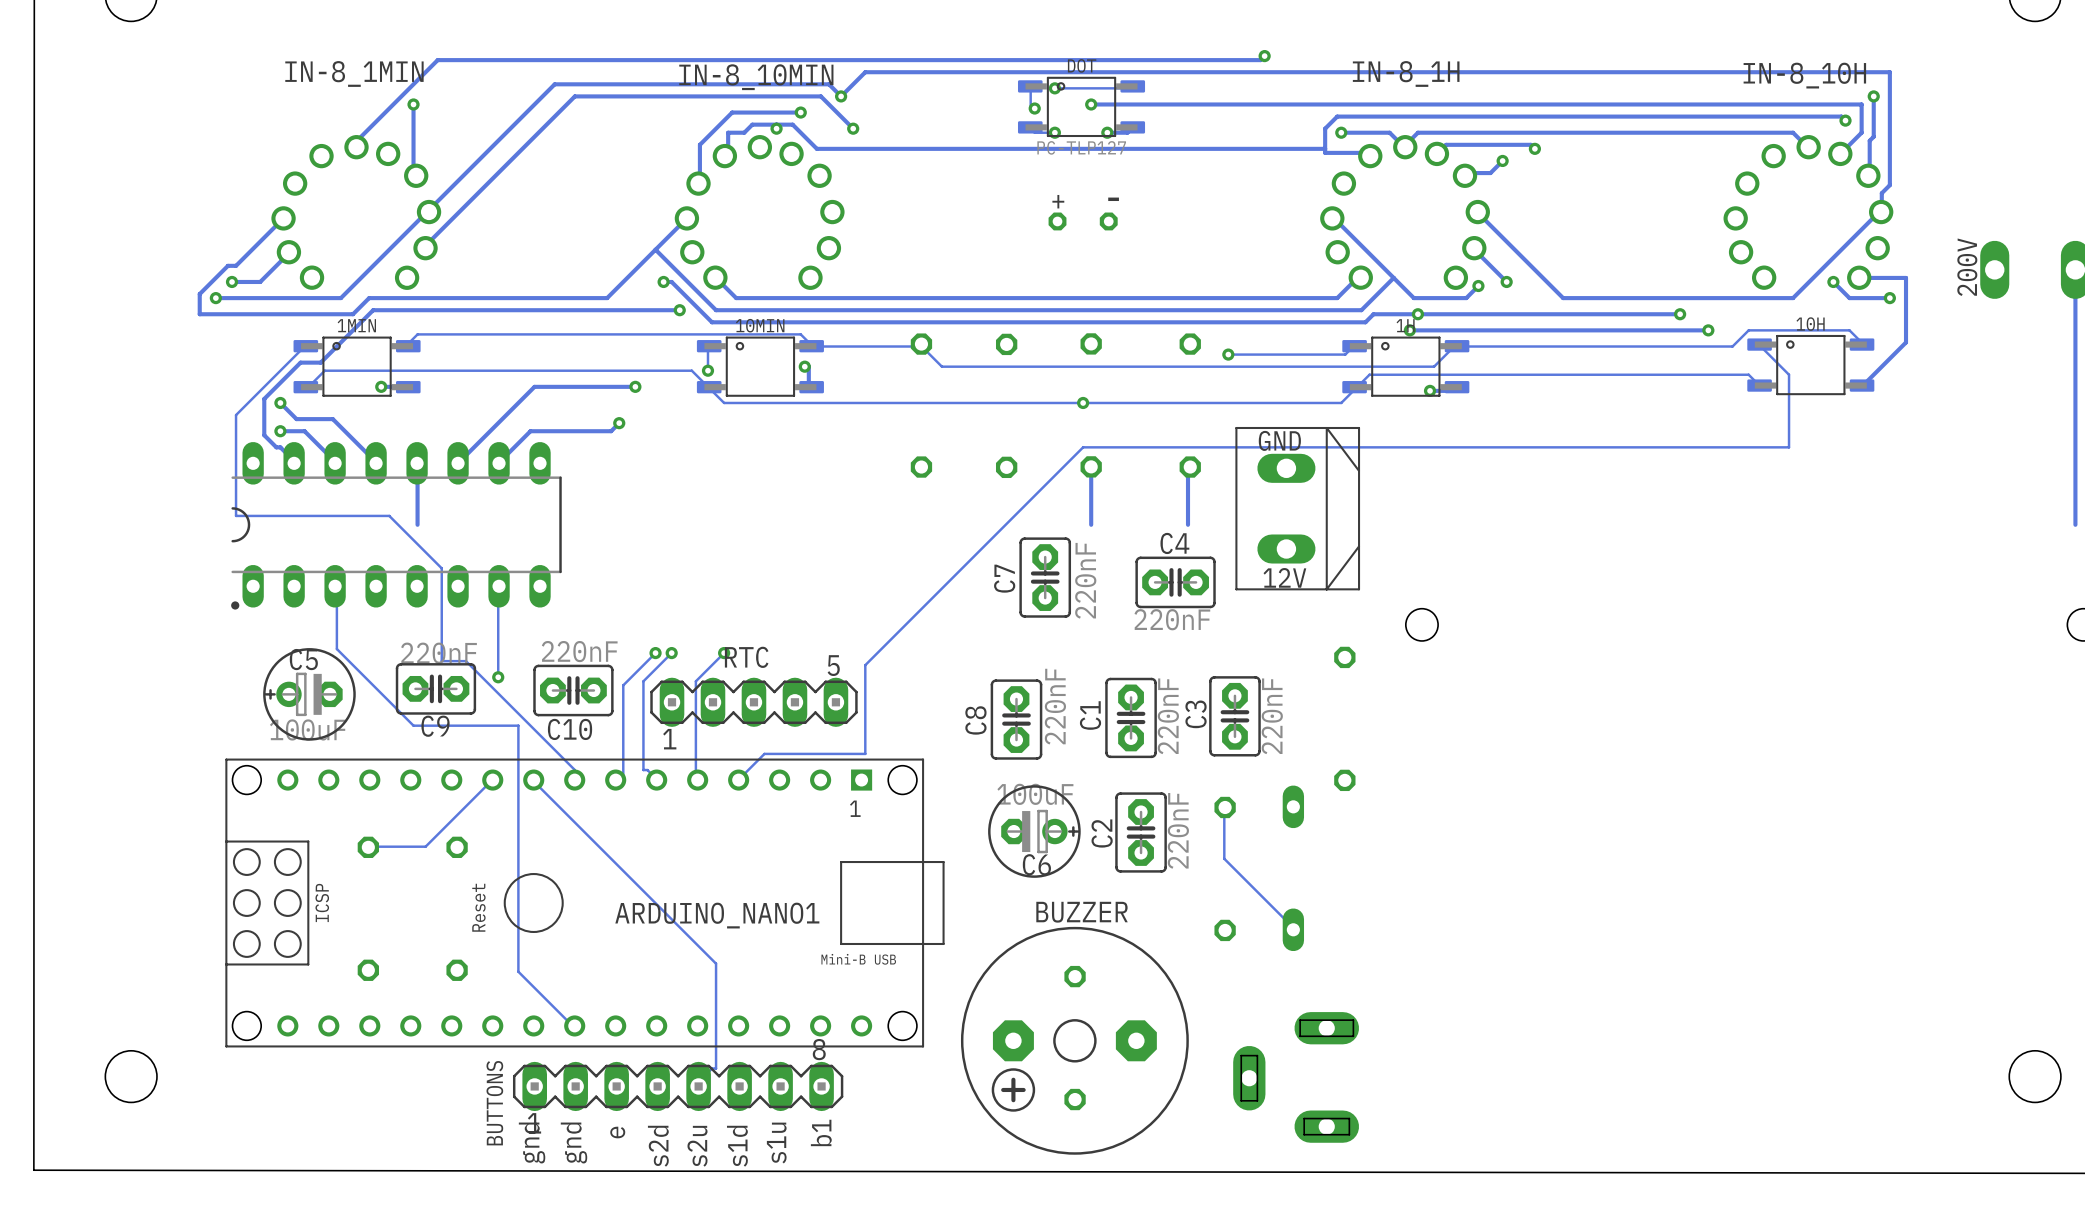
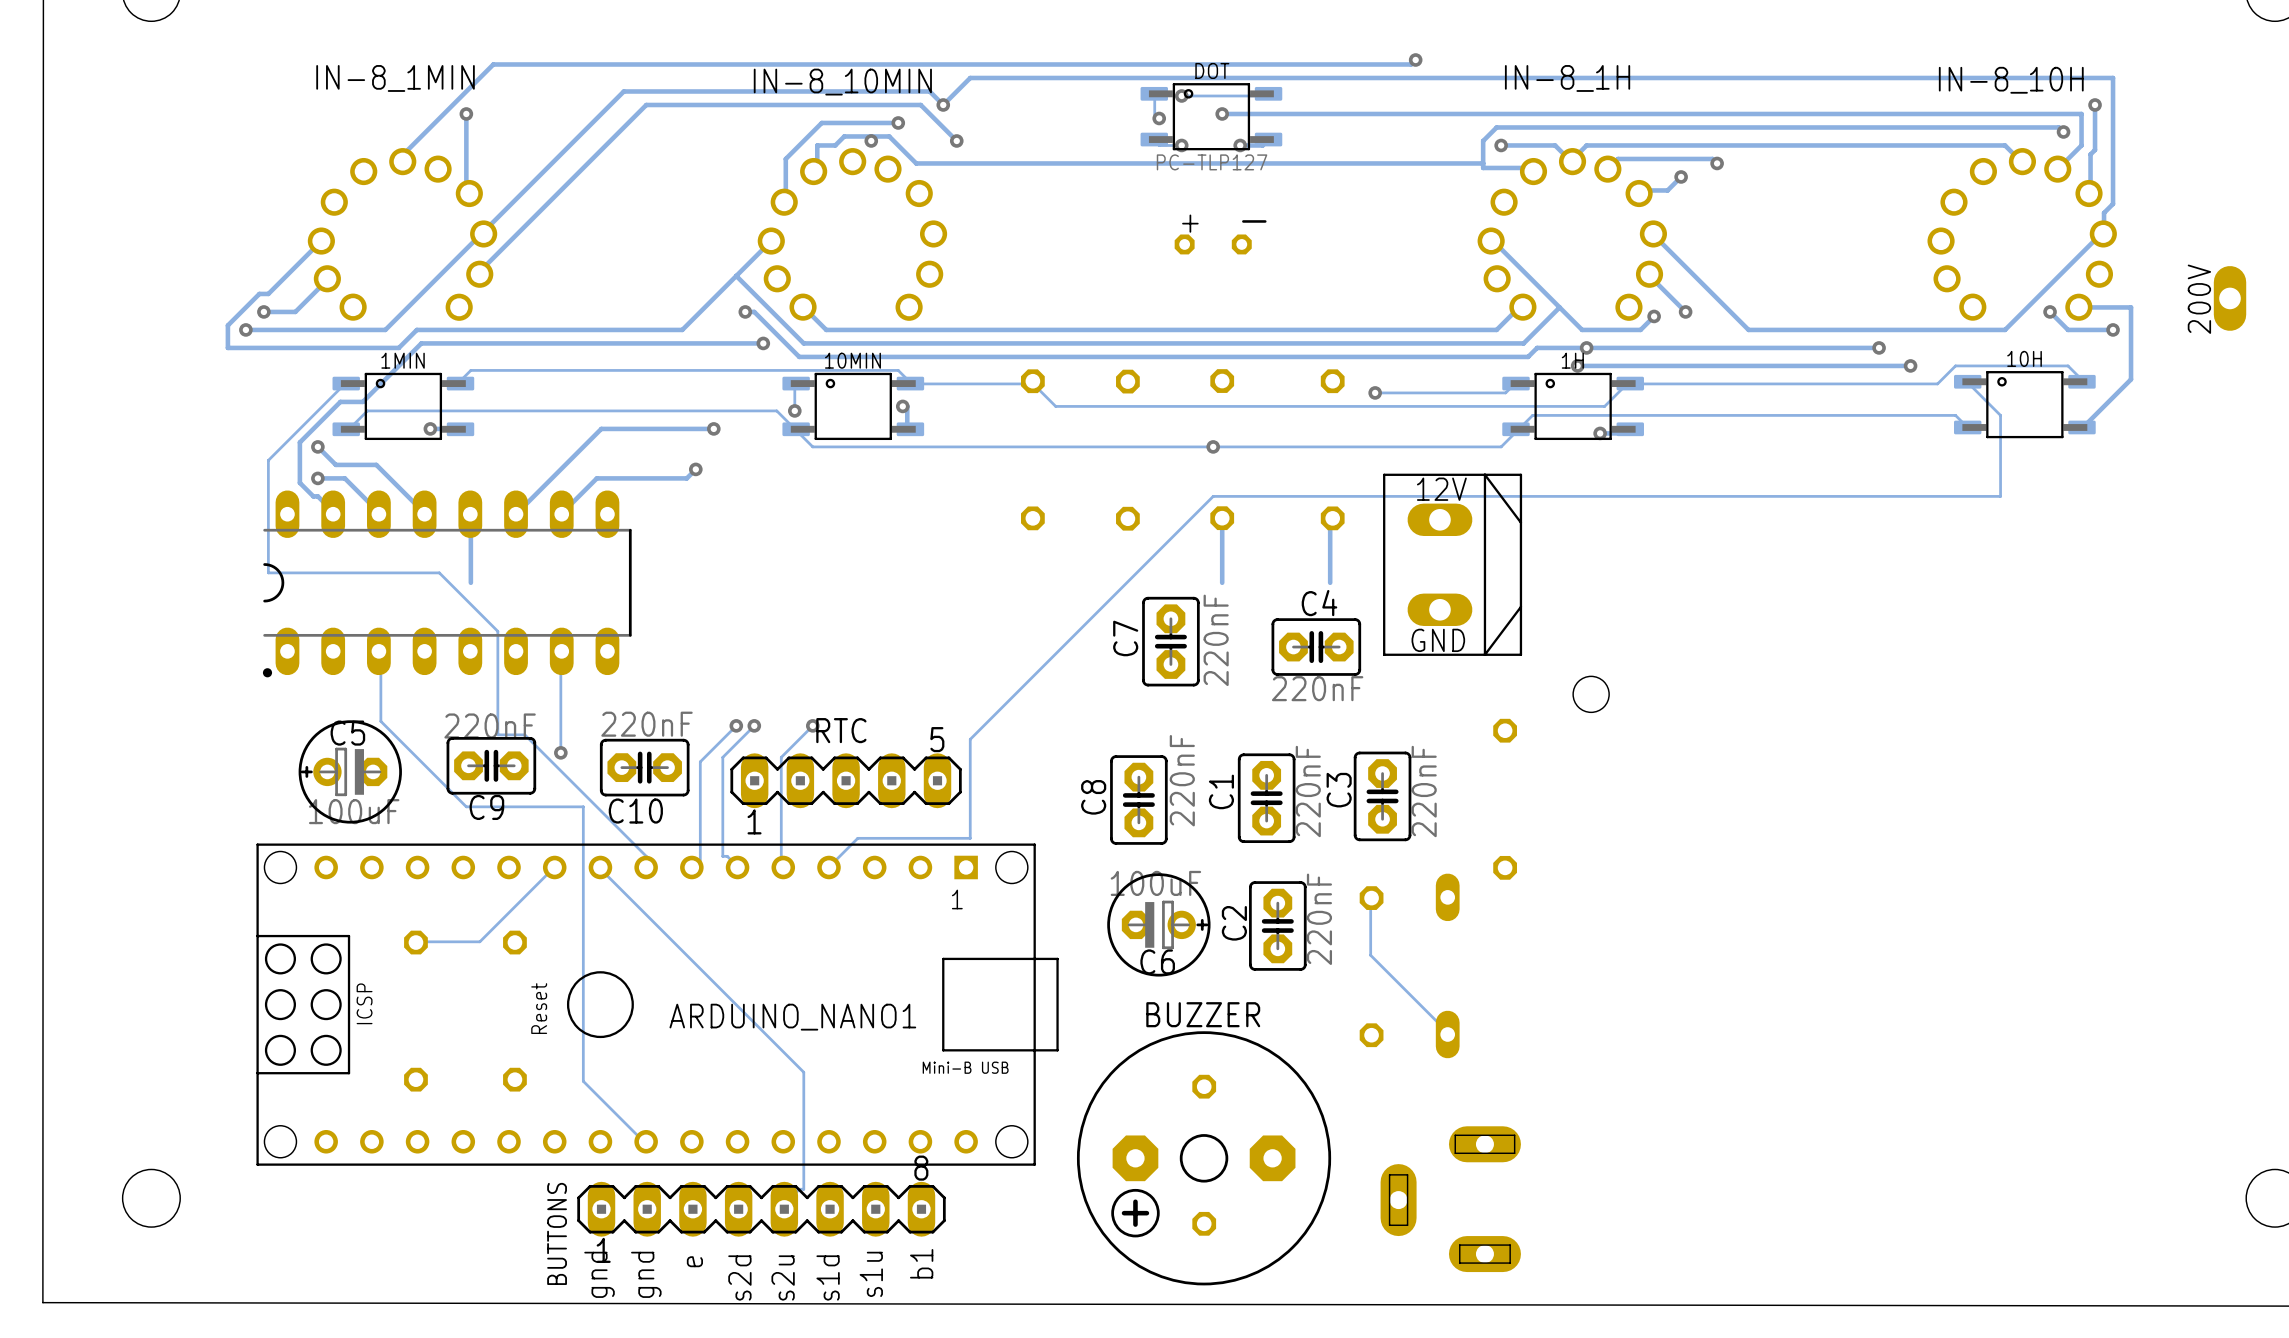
text position: GND (1279, 440) -> GND (1438, 640)
text position: 12V (1284, 577) -> 12V (1441, 489)

